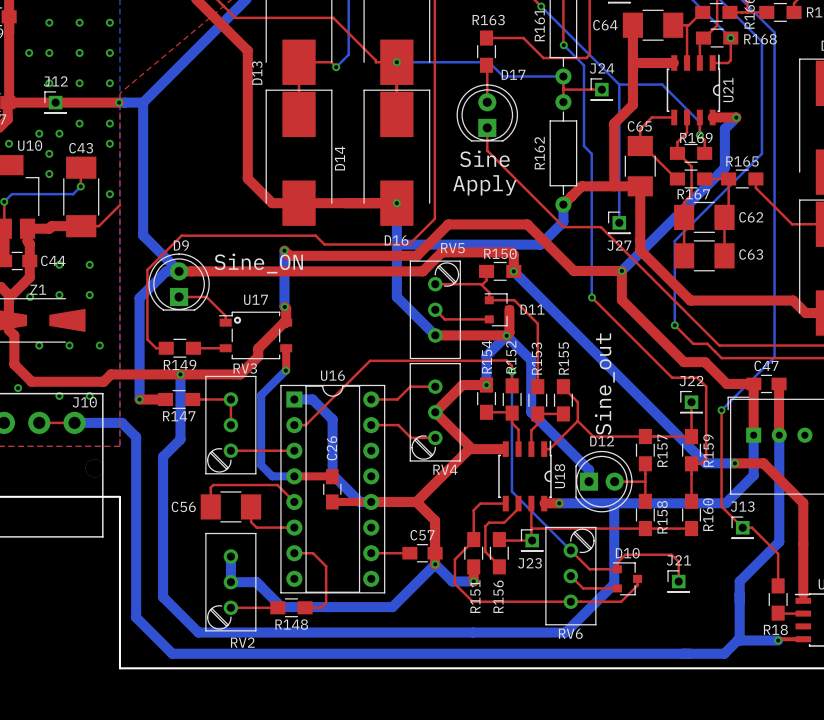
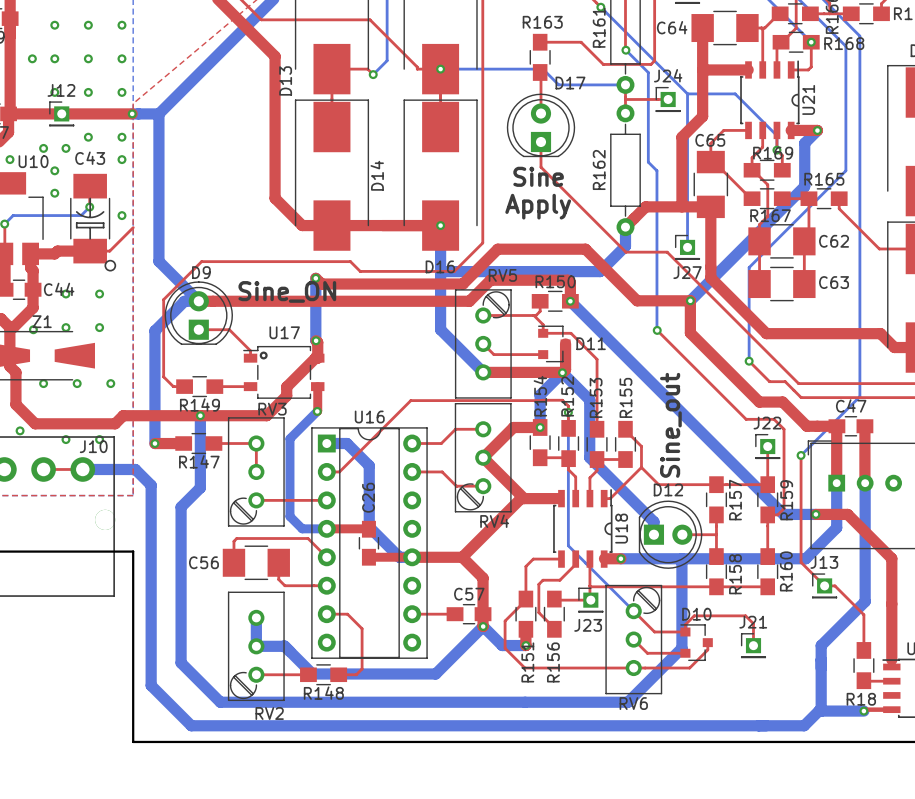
C43 footprint: [63, 156, 100, 238] -> [70, 173, 117, 272]

